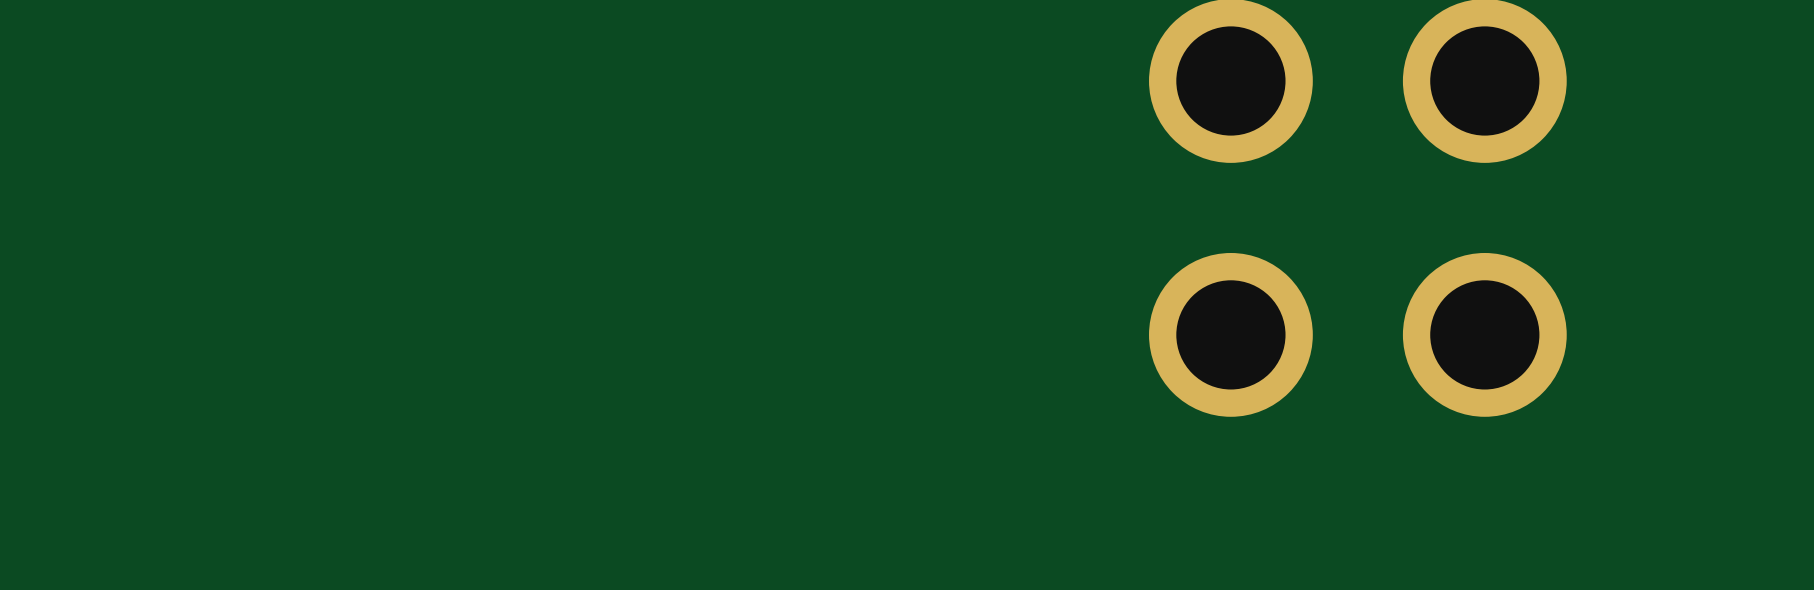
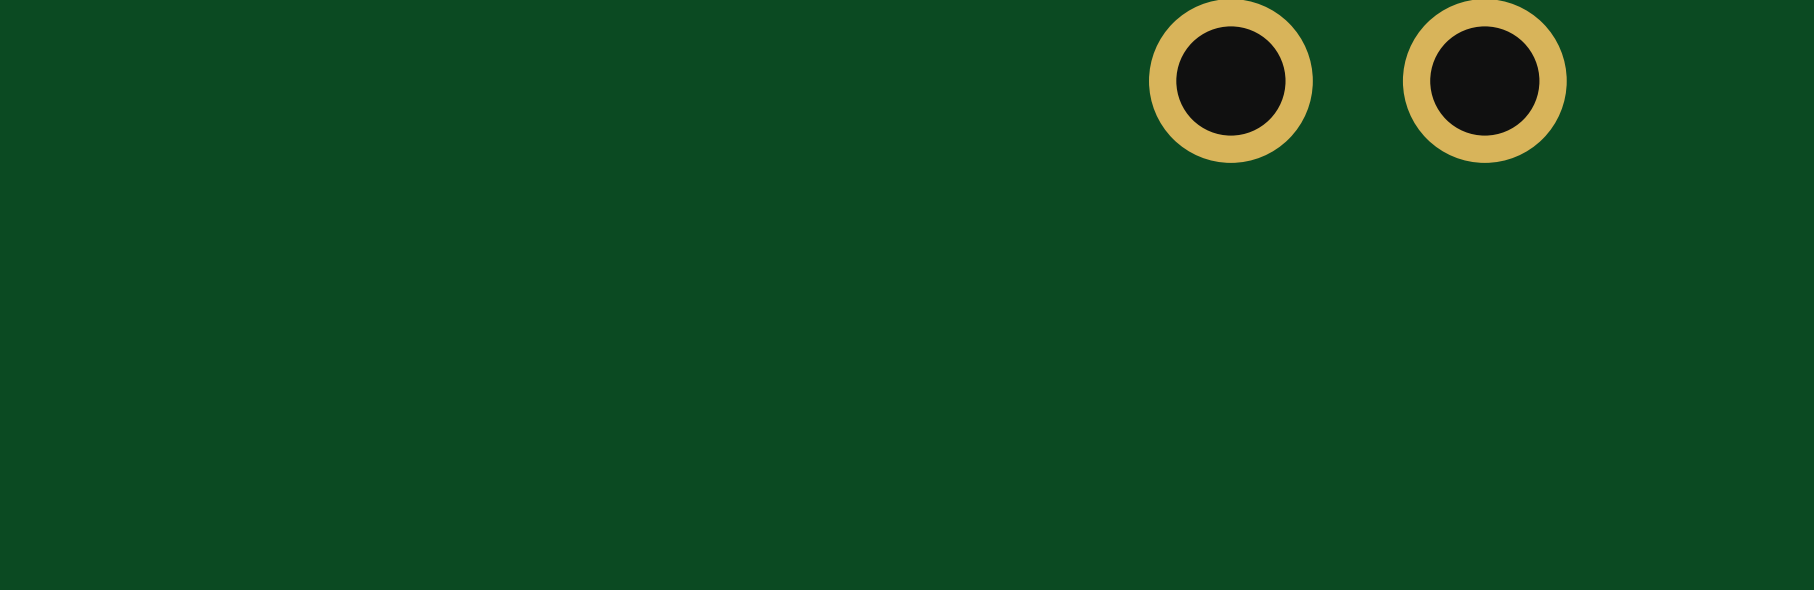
part: (1230, 334) -> none
part: (1484, 334) -> none

